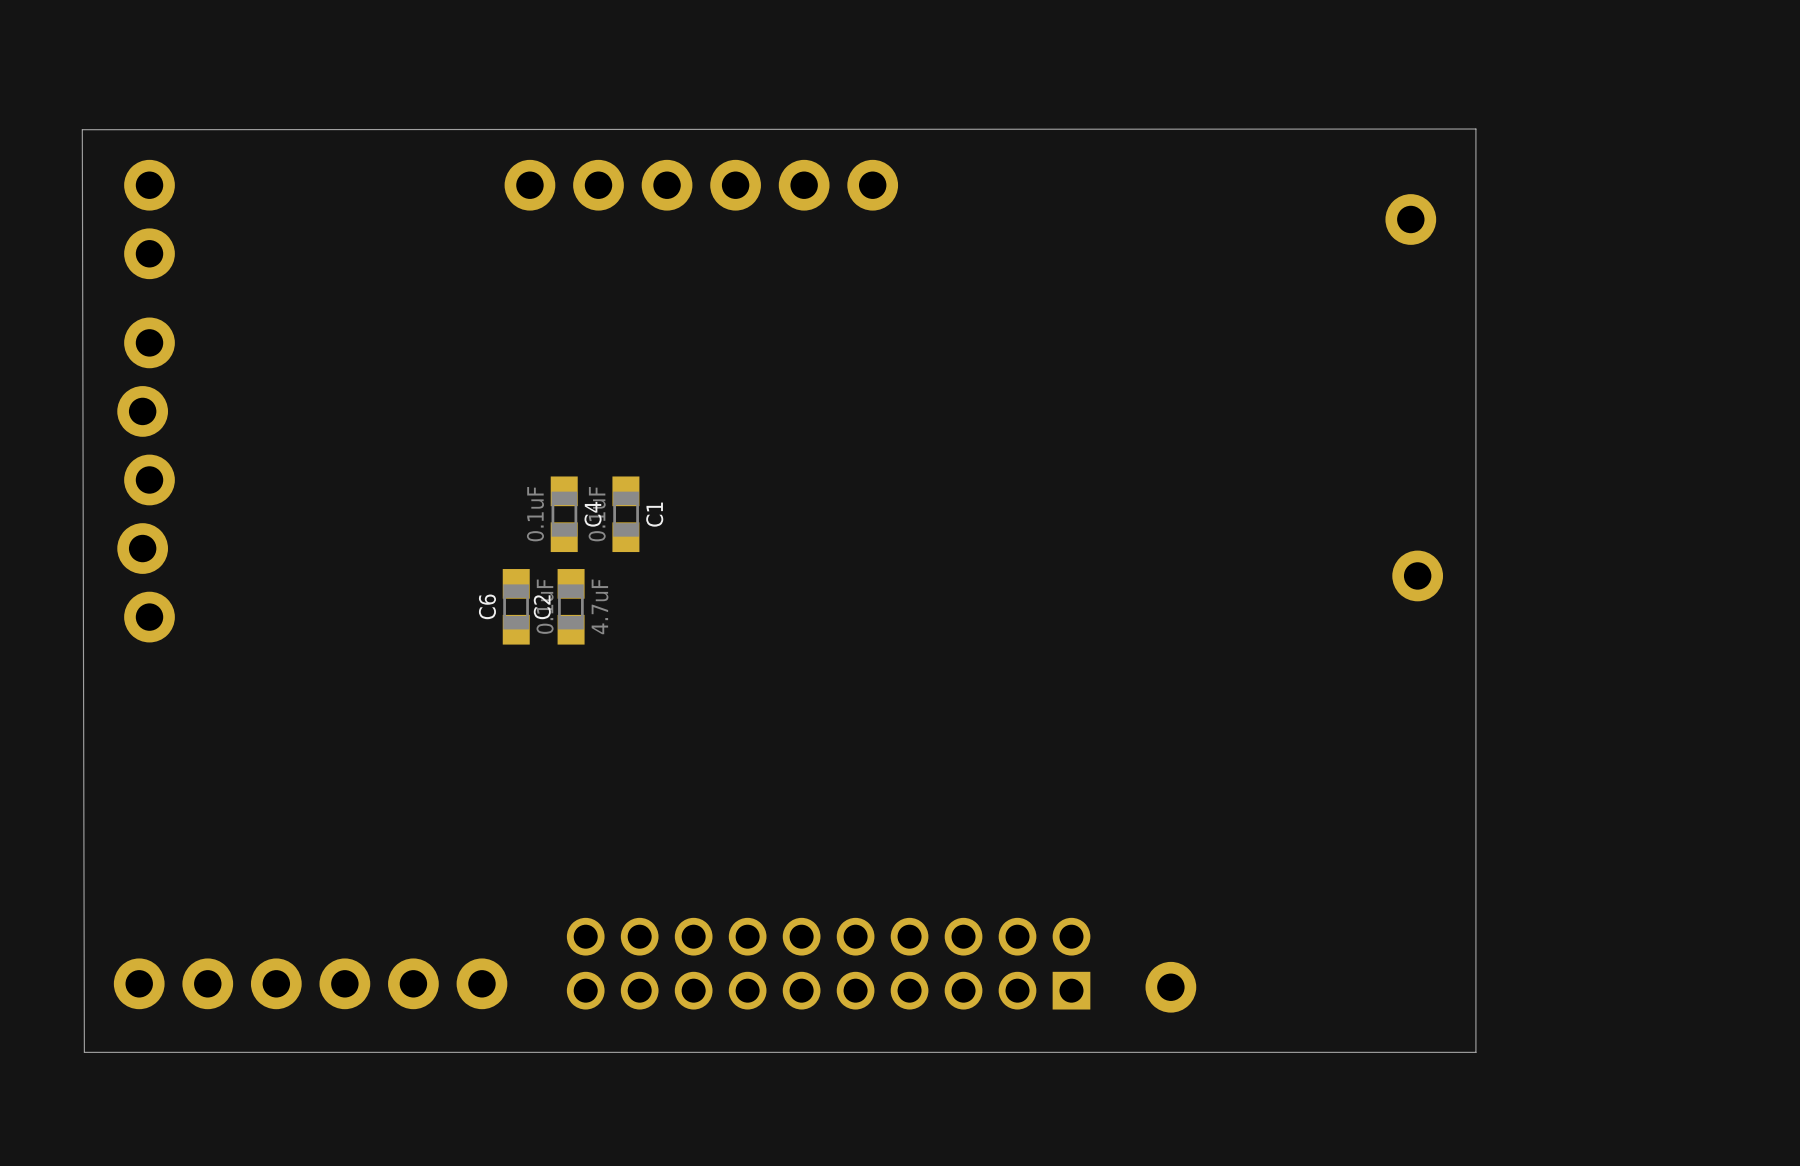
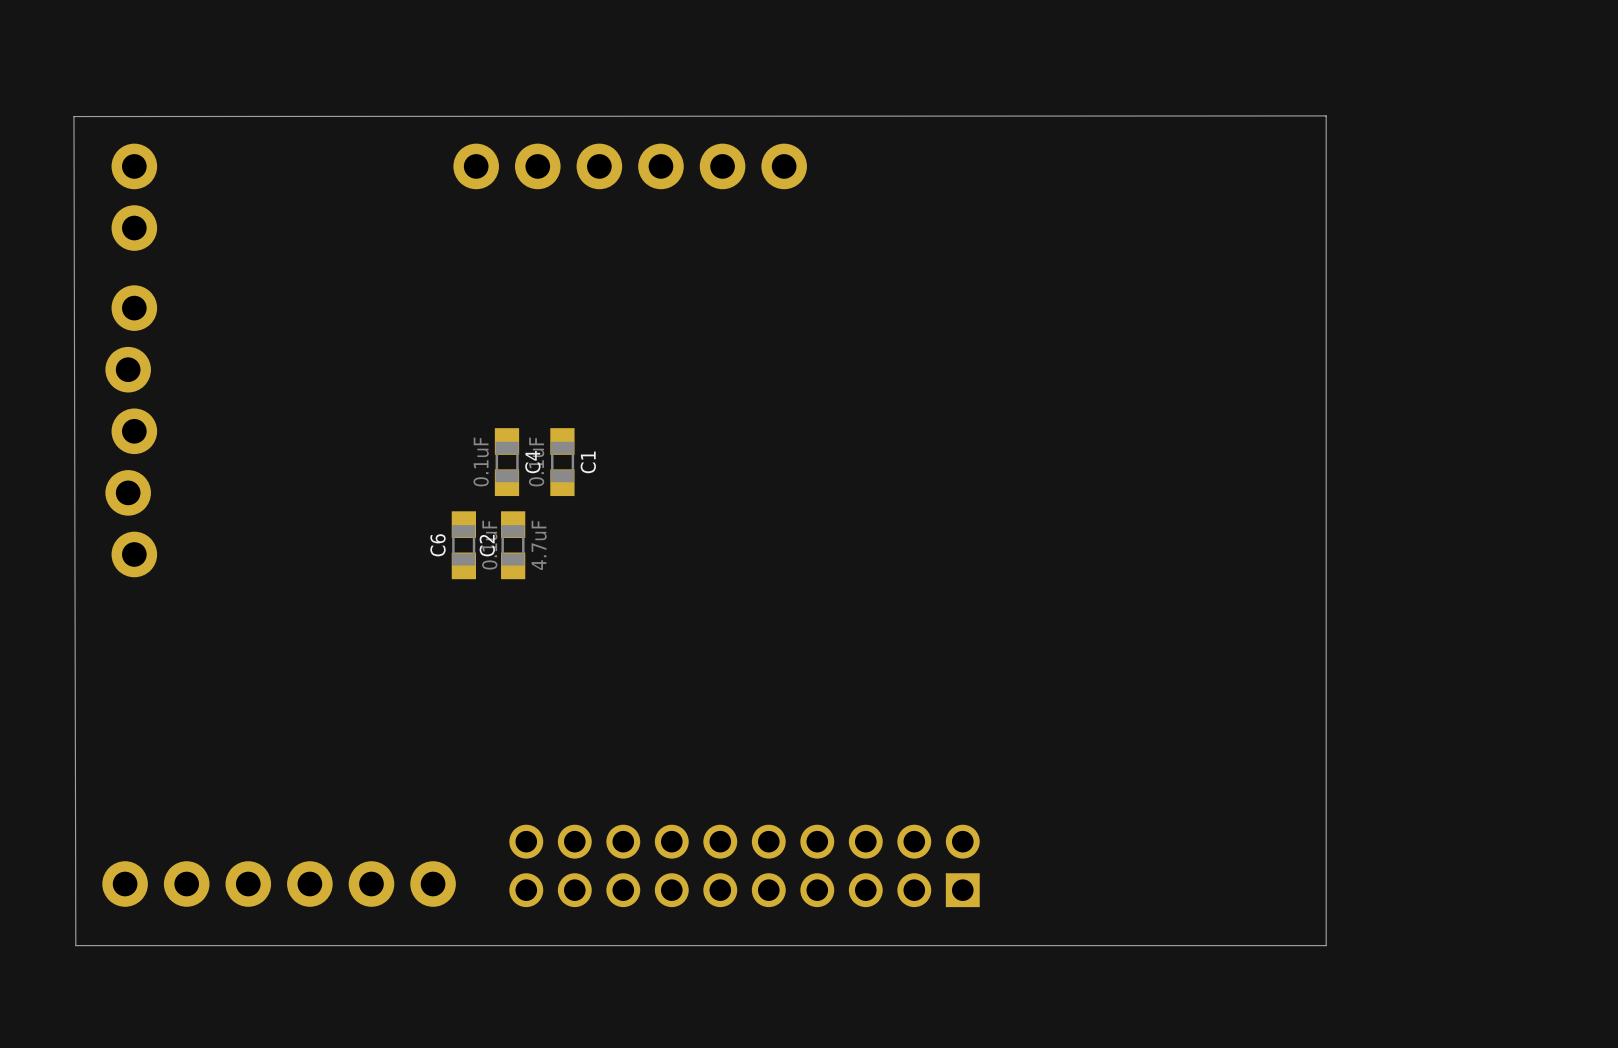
part: (1410, 219) -> none
part: (1417, 575) -> none
part: (1170, 987) -> none

